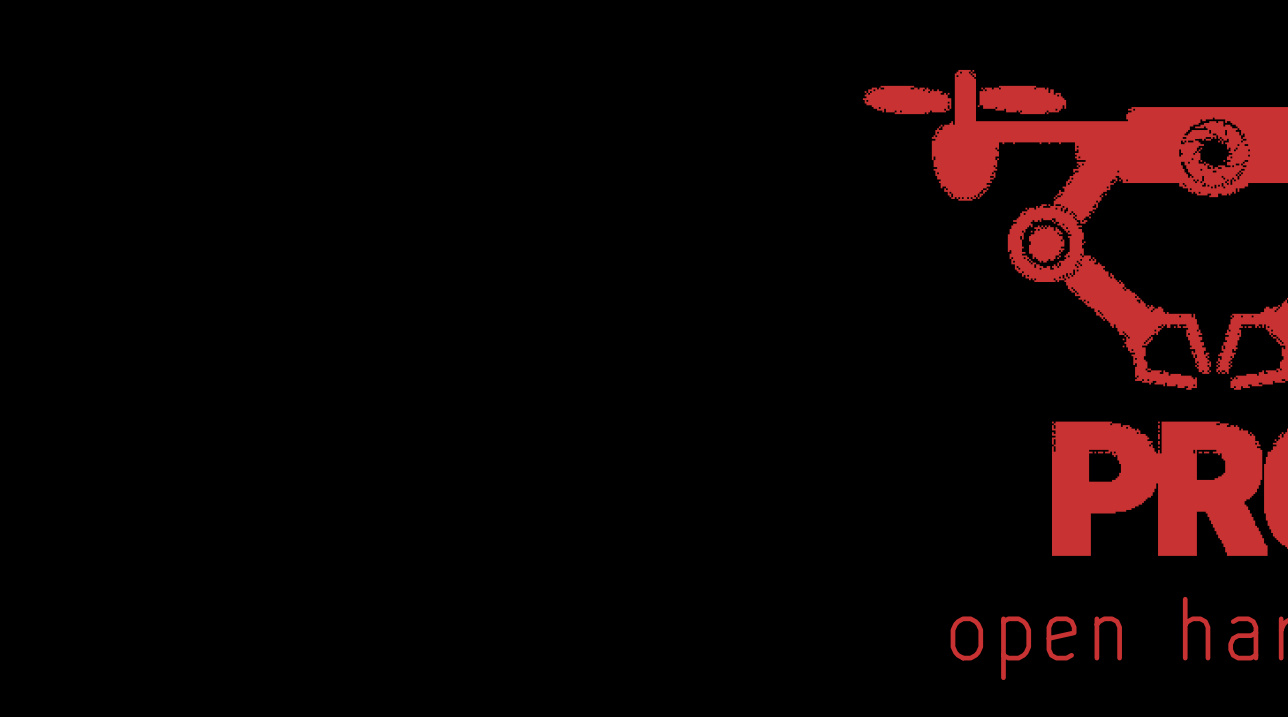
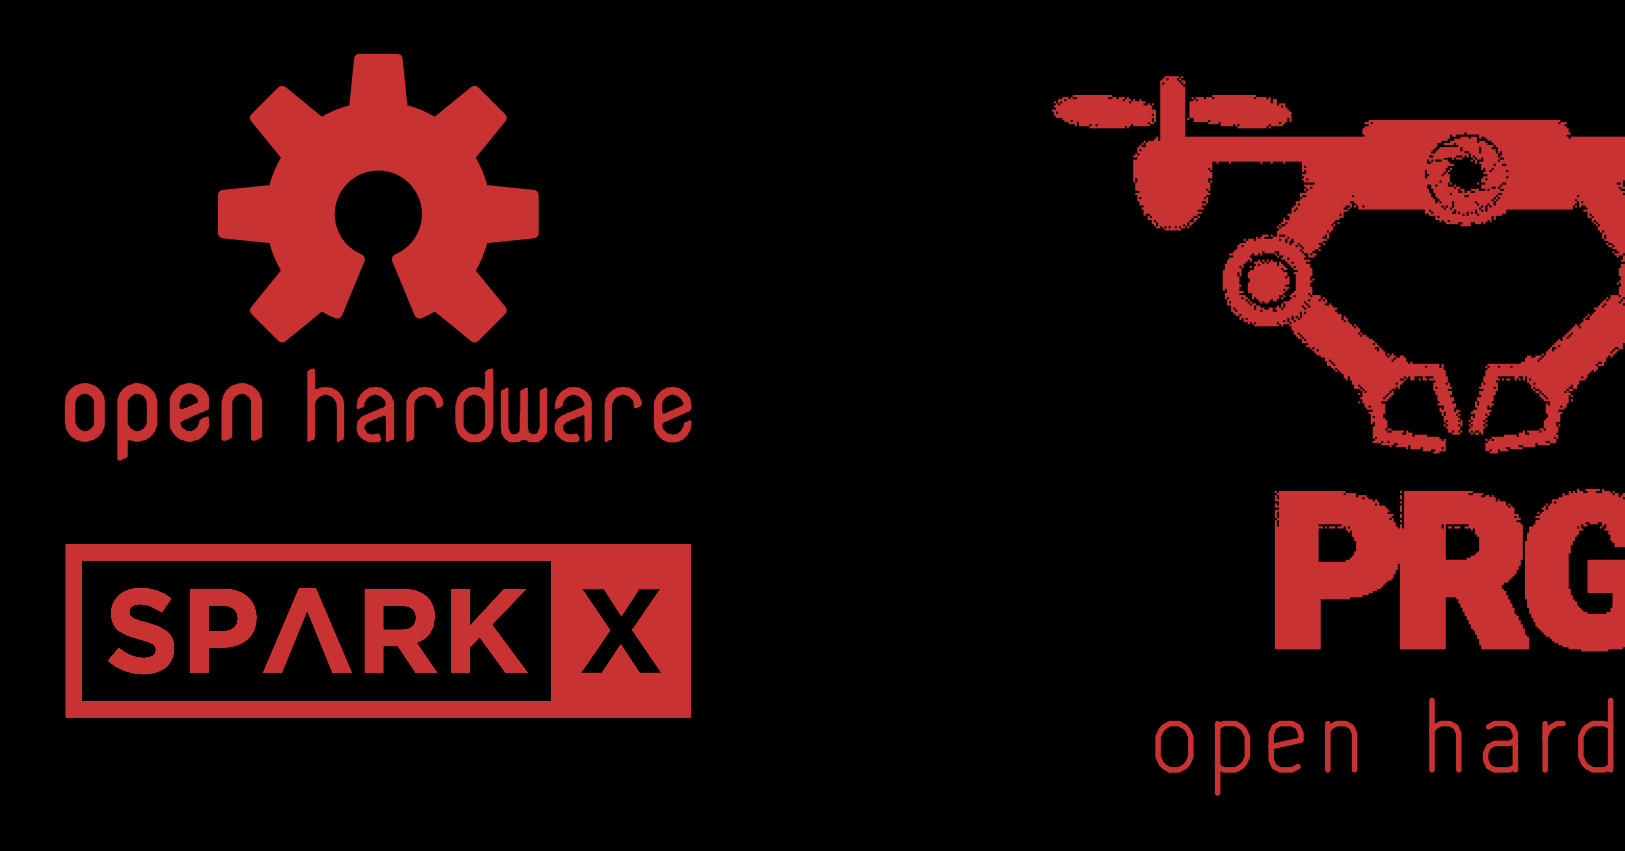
part: none -> (378, 257)
part: none -> (378, 630)

